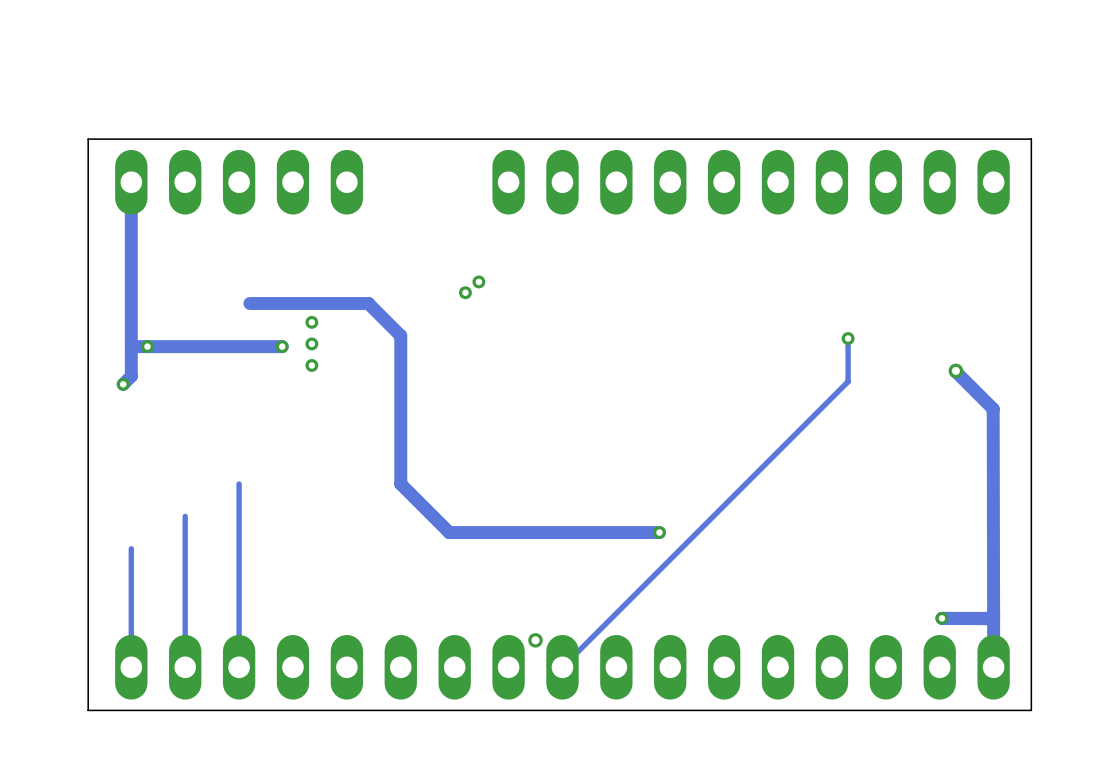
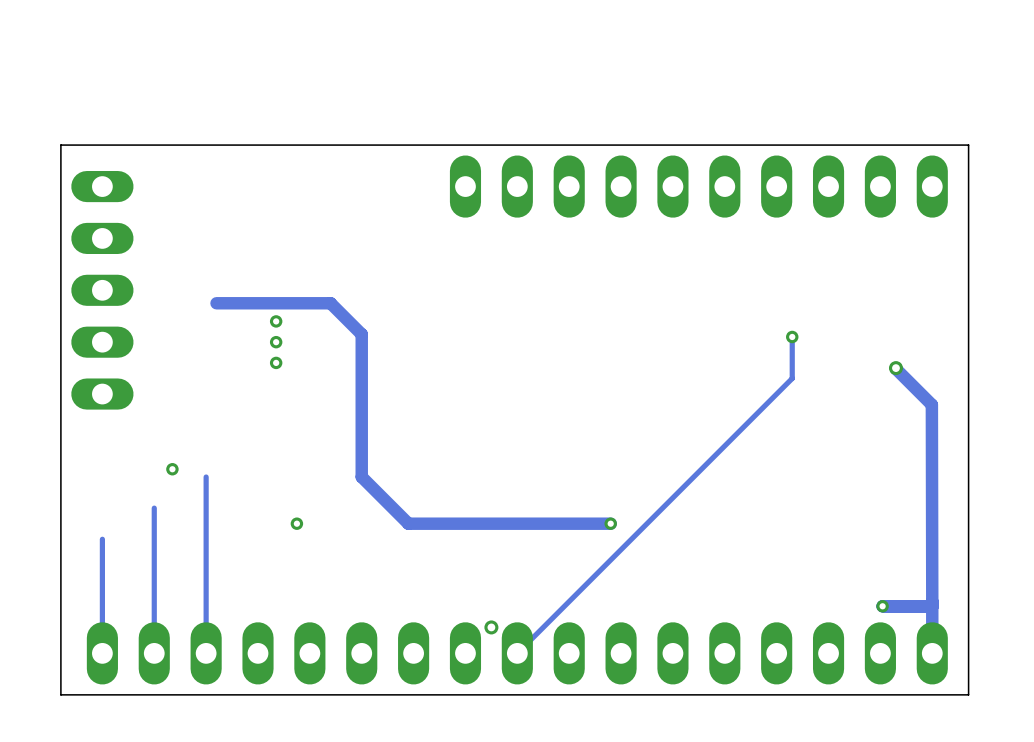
track: (131, 182) (131, 343) (134, 346) -> none
part rotation: 0° (239, 182) -> 90° clockwise (102, 290)
part position: (239, 182) -> (102, 290)
via: (478, 281) -> none
via: (465, 292) -> none
via: (147, 346) -> none
track: (282, 346) (131, 346) (131, 376) (123, 384) -> none
via: (282, 346) -> none
via: (123, 384) -> none
via: none -> (172, 469)
via: none -> (296, 523)

